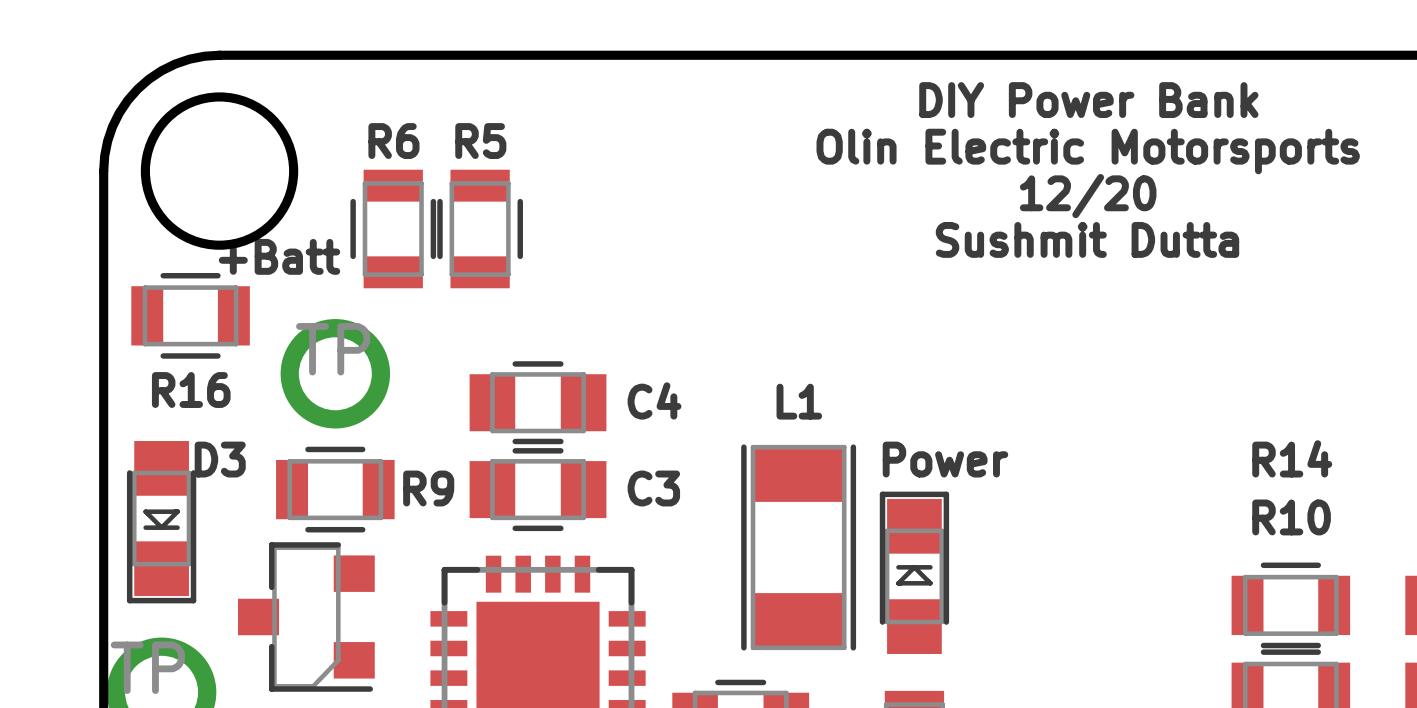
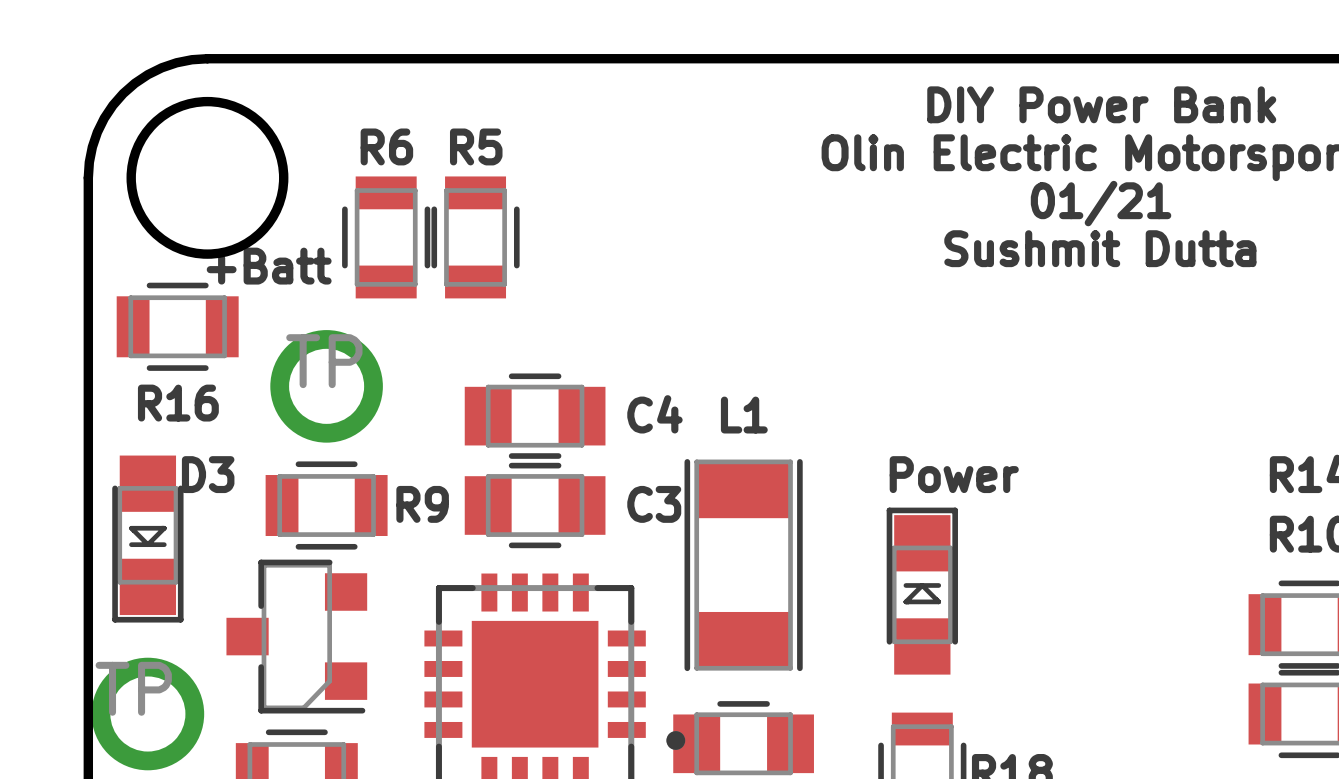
text: 12/20 (1088, 196) -> 01/21 (1101, 203)
L1 position: (798, 547) -> (743, 565)

